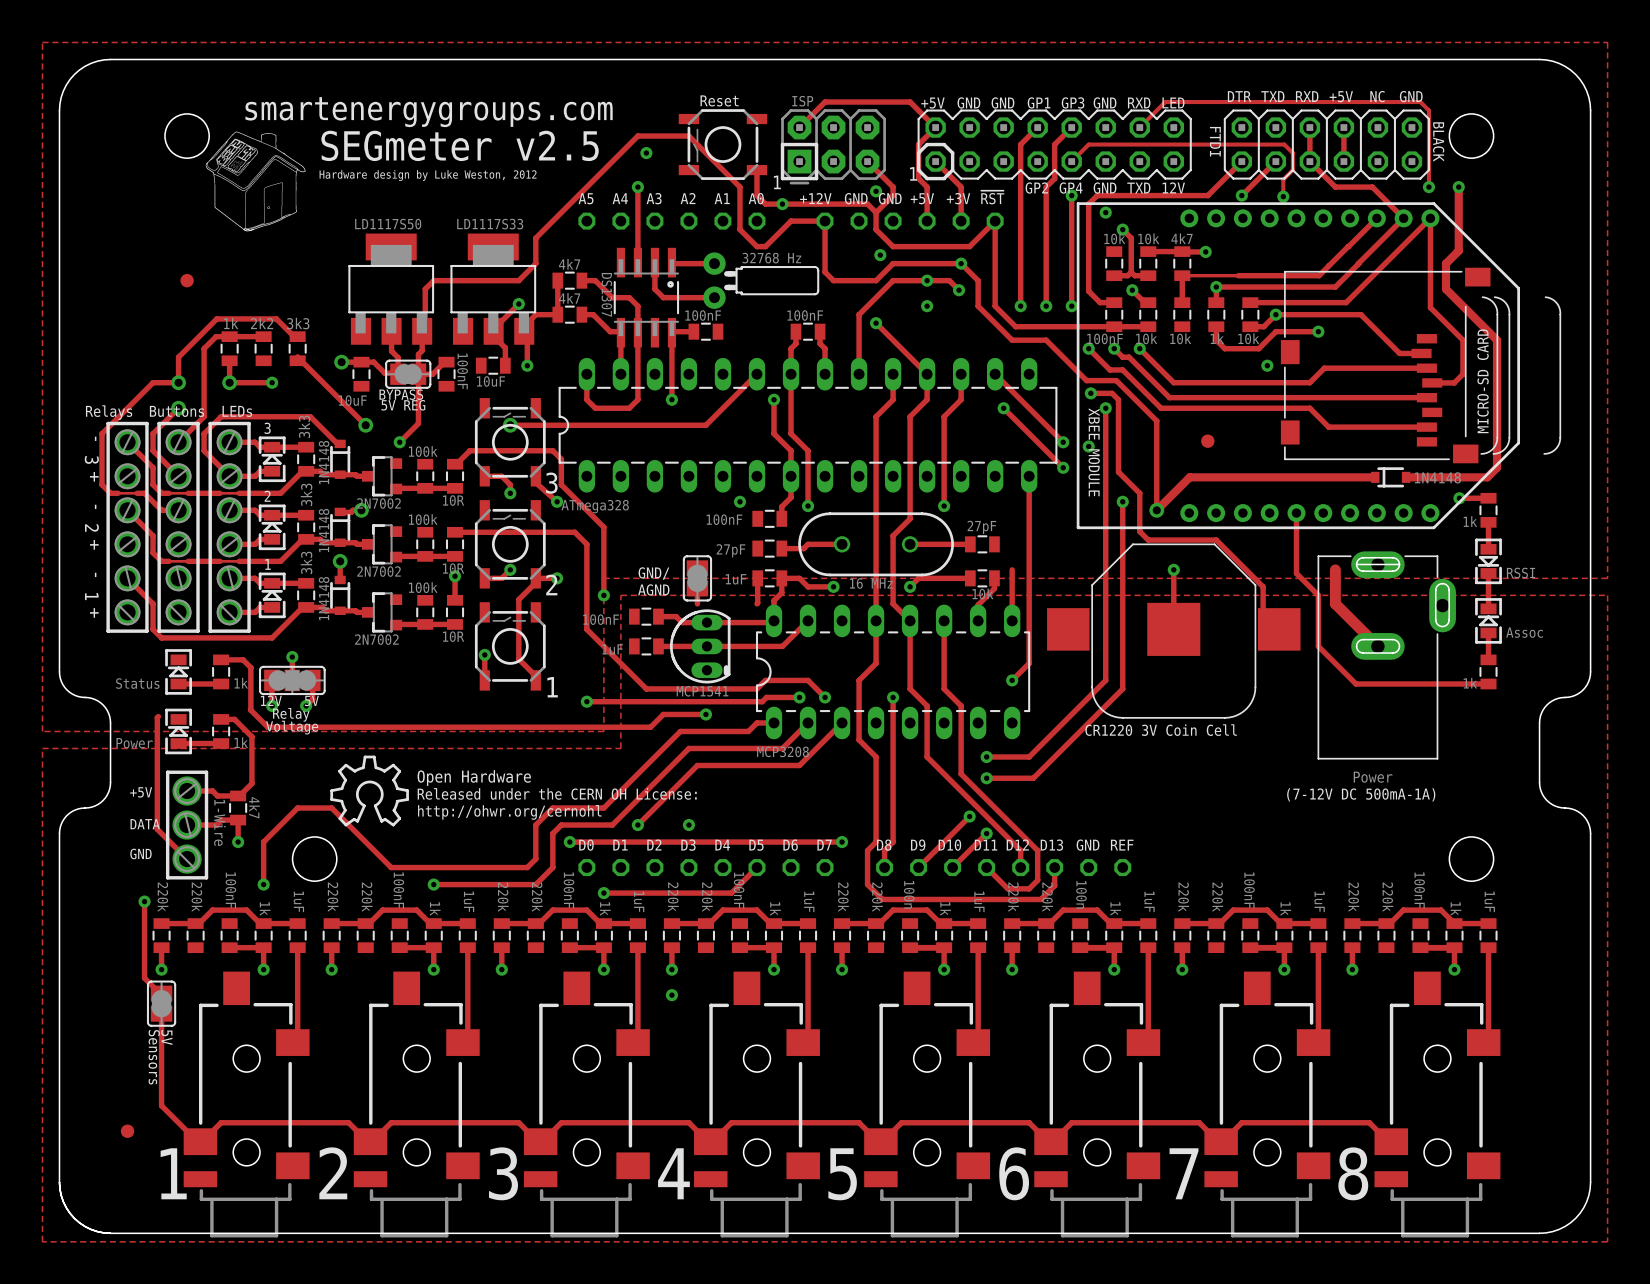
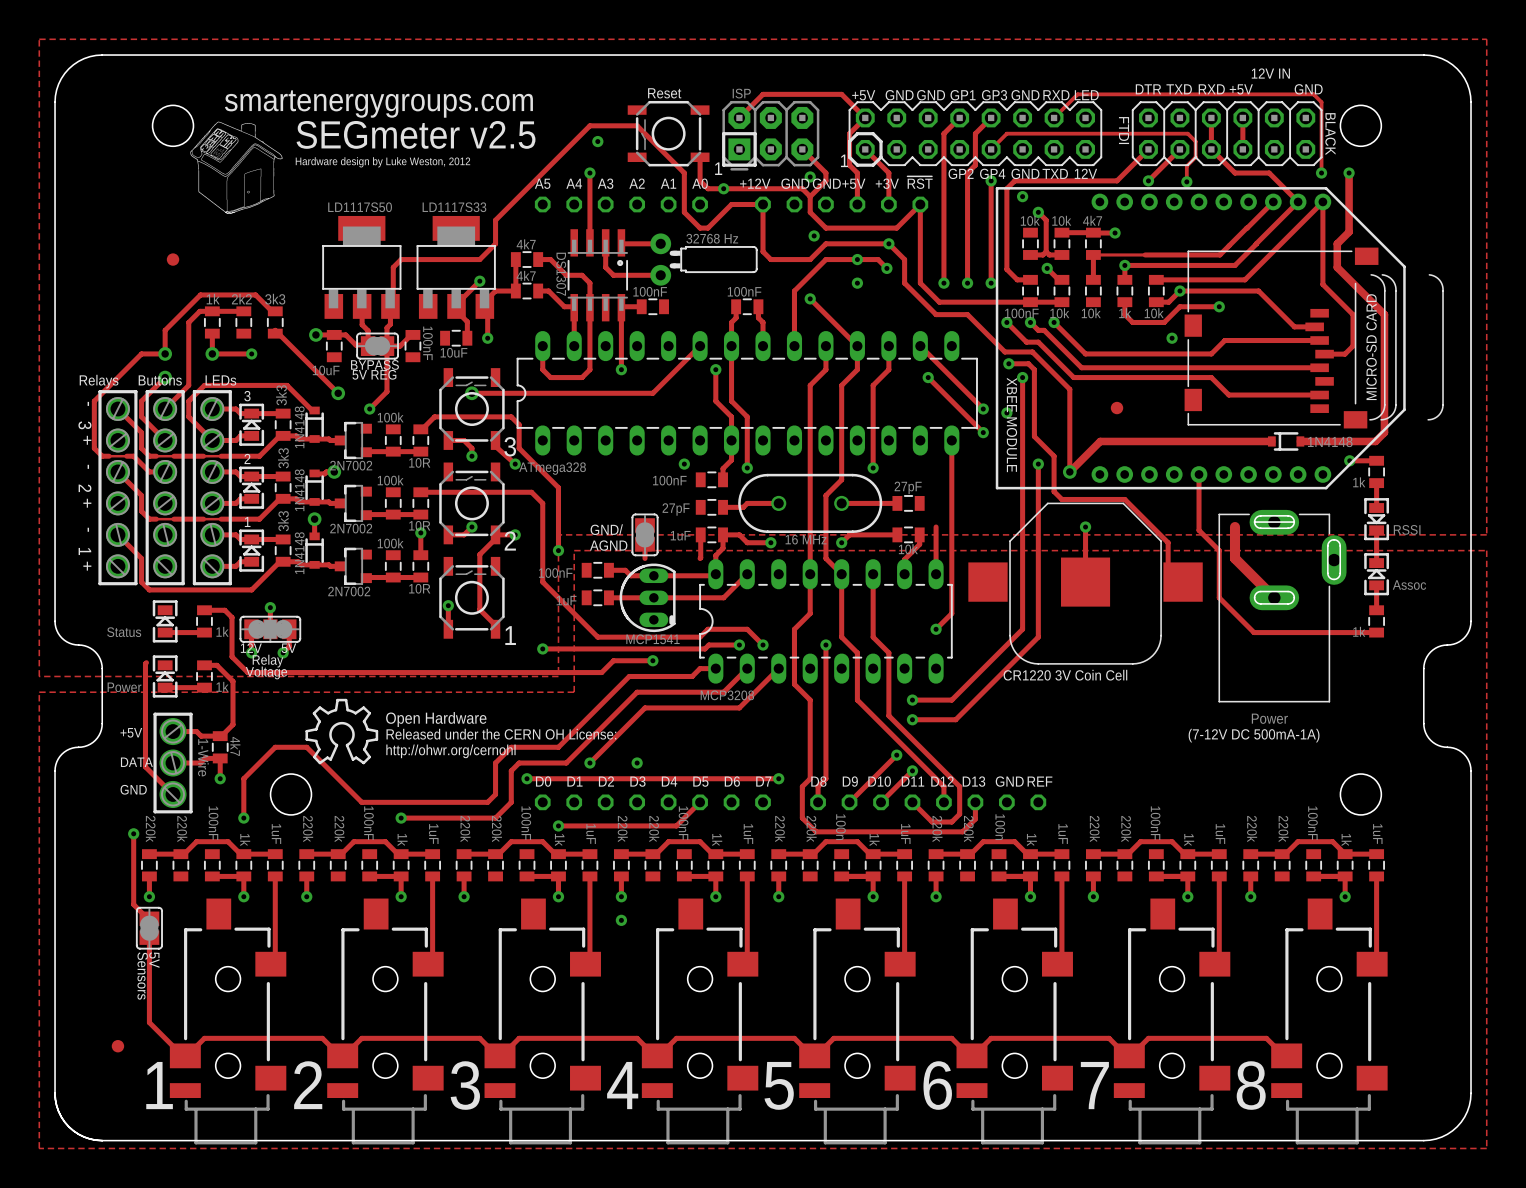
text: none -> 12V IN (1270, 73)
text: NC (1377, 96) -> none

